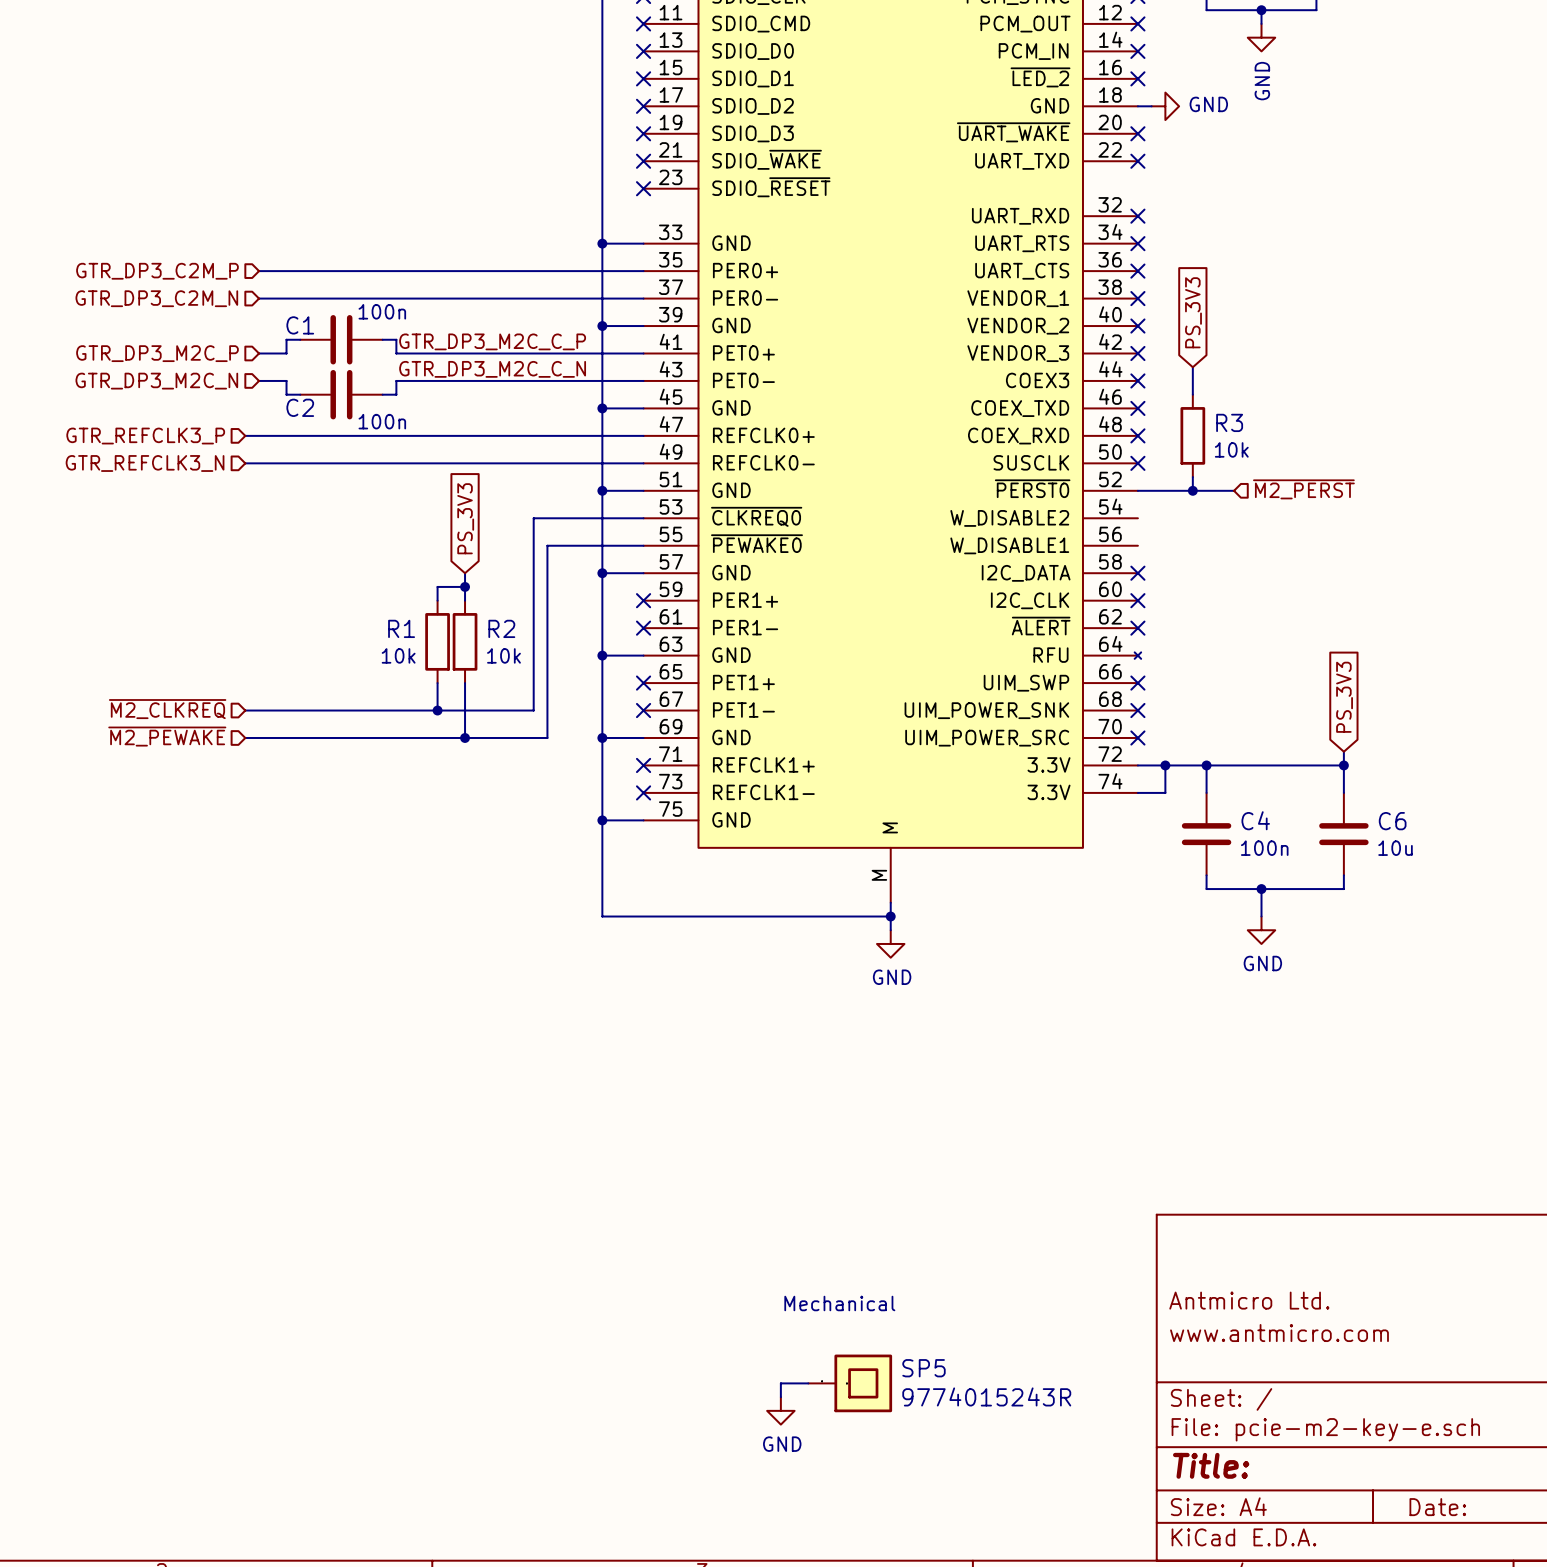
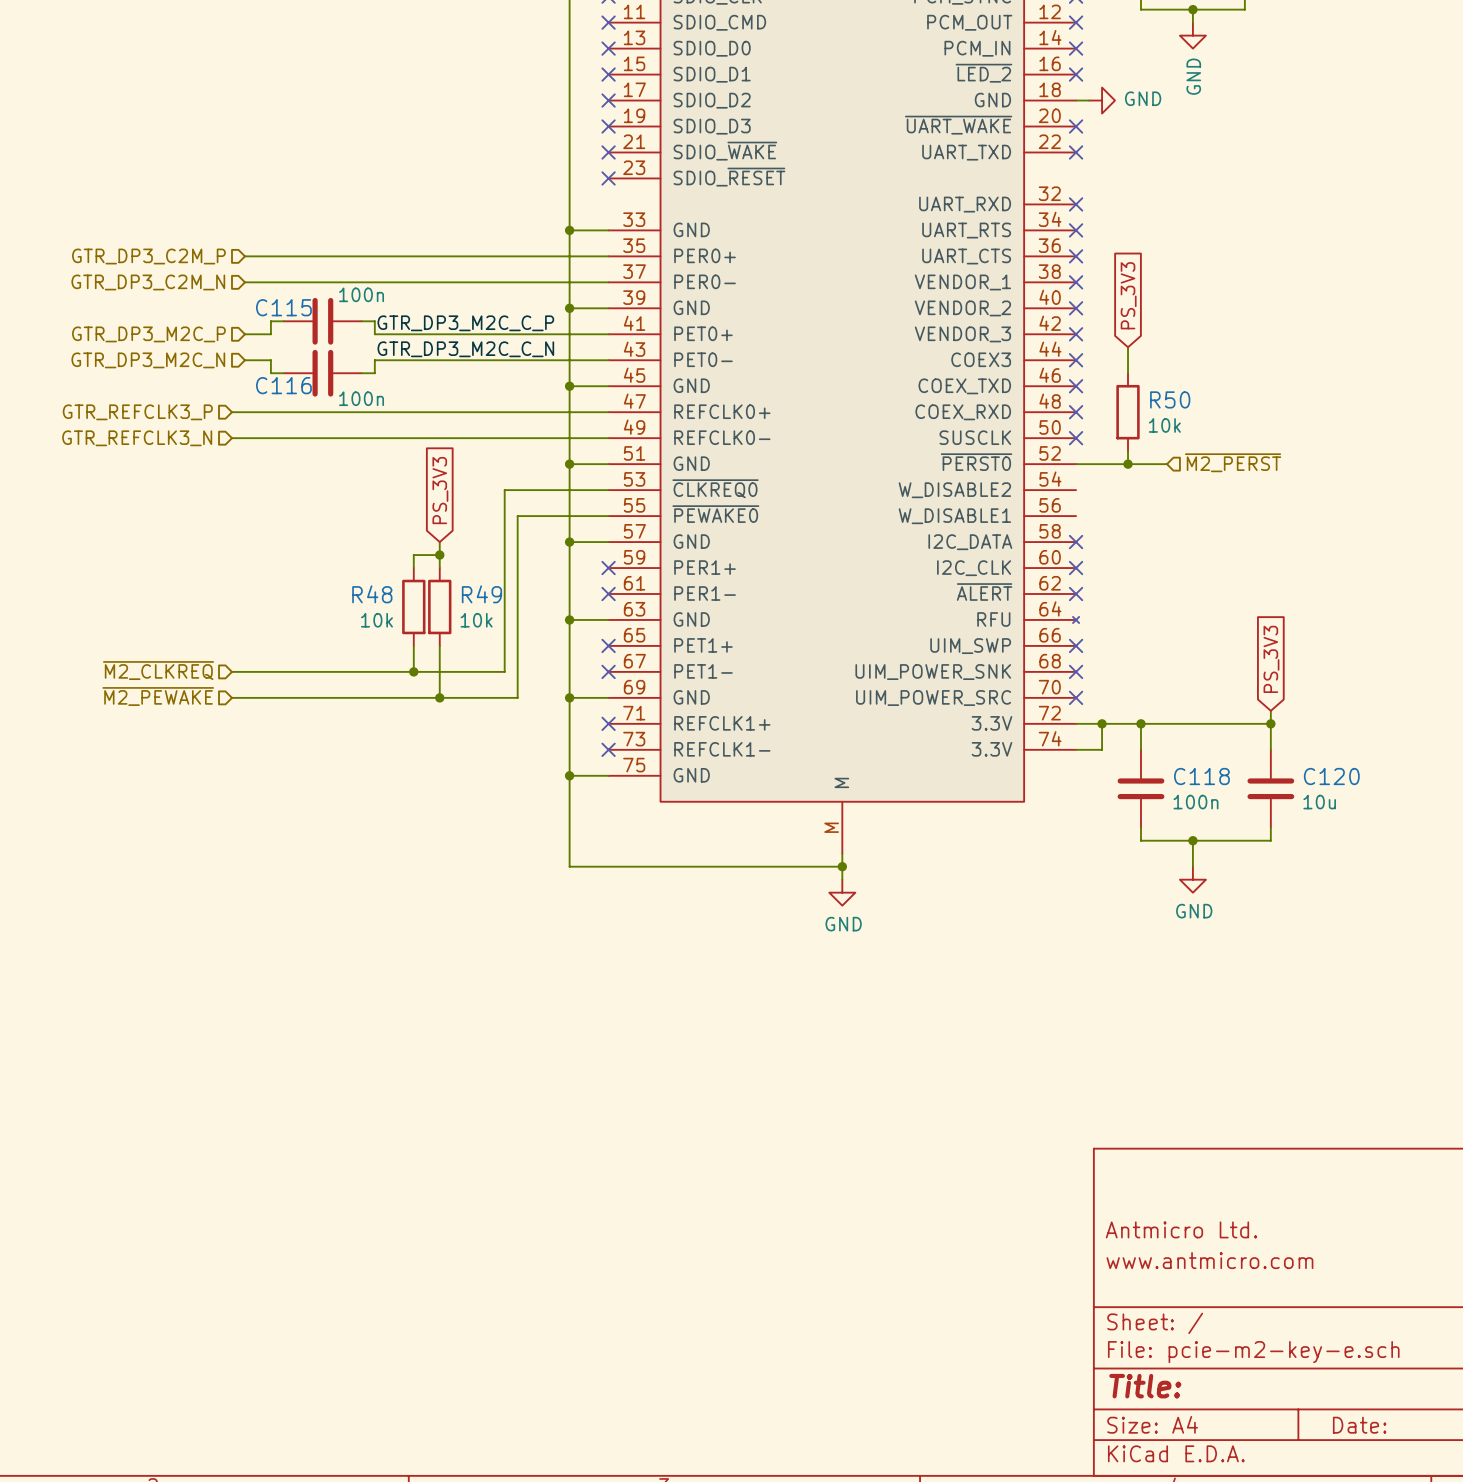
C1 name: C1 (300, 325) -> C115 (283, 307)
C2 name: C2 (300, 407) -> C116 (283, 385)
R3 name: R3 (1229, 422) -> R50 (1170, 399)
R1 name: R1 (401, 628) -> R48 (372, 594)
R2 name: R2 (501, 628) -> R49 (481, 594)
C4 name: C4 (1255, 820) -> C118 (1201, 776)
C6 name: C6 (1392, 821) -> C120 (1331, 776)
text: Mechanical (839, 1303) -> none
wire: (808, 1383) (780, 1383) (780, 1397) -> none
SP5: 9774015243R (850, 1383) -> none
power symbol: GND (780, 1410) -> none

